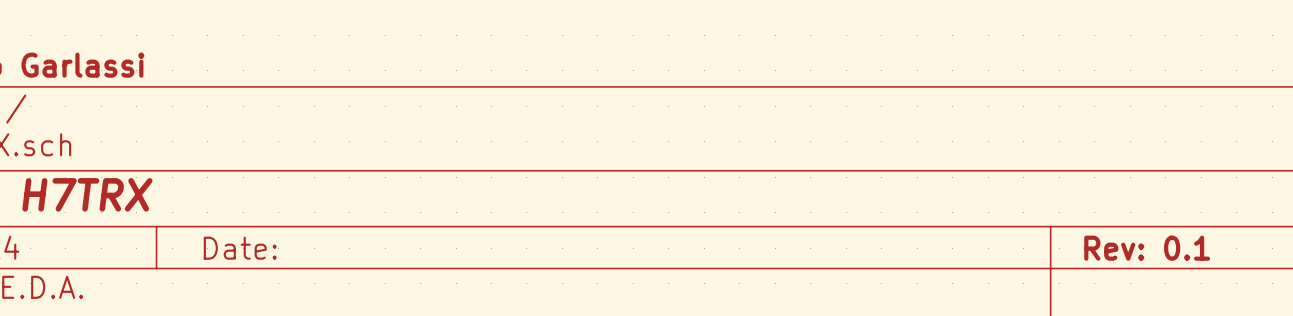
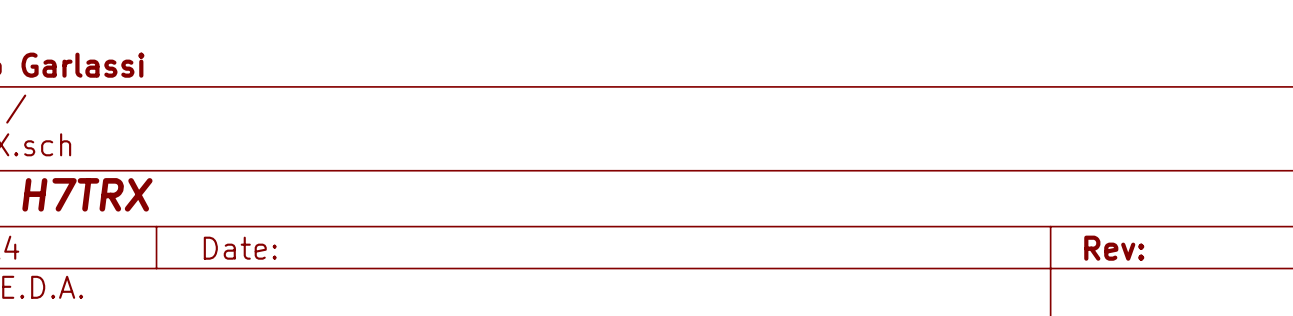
title block: Rev: 0.1 (1147, 248) -> Rev: (1114, 248)

